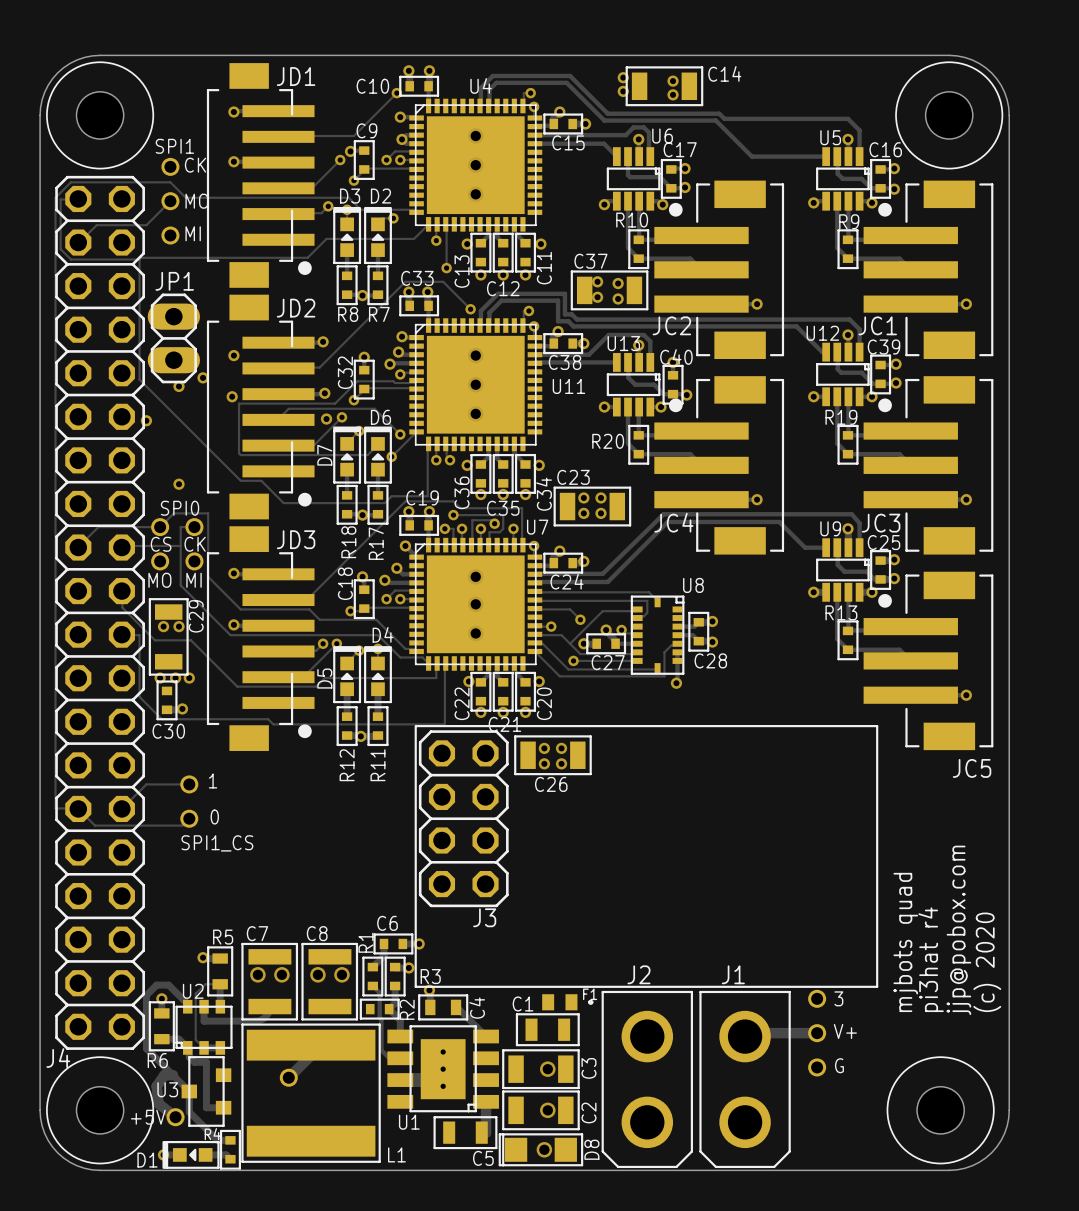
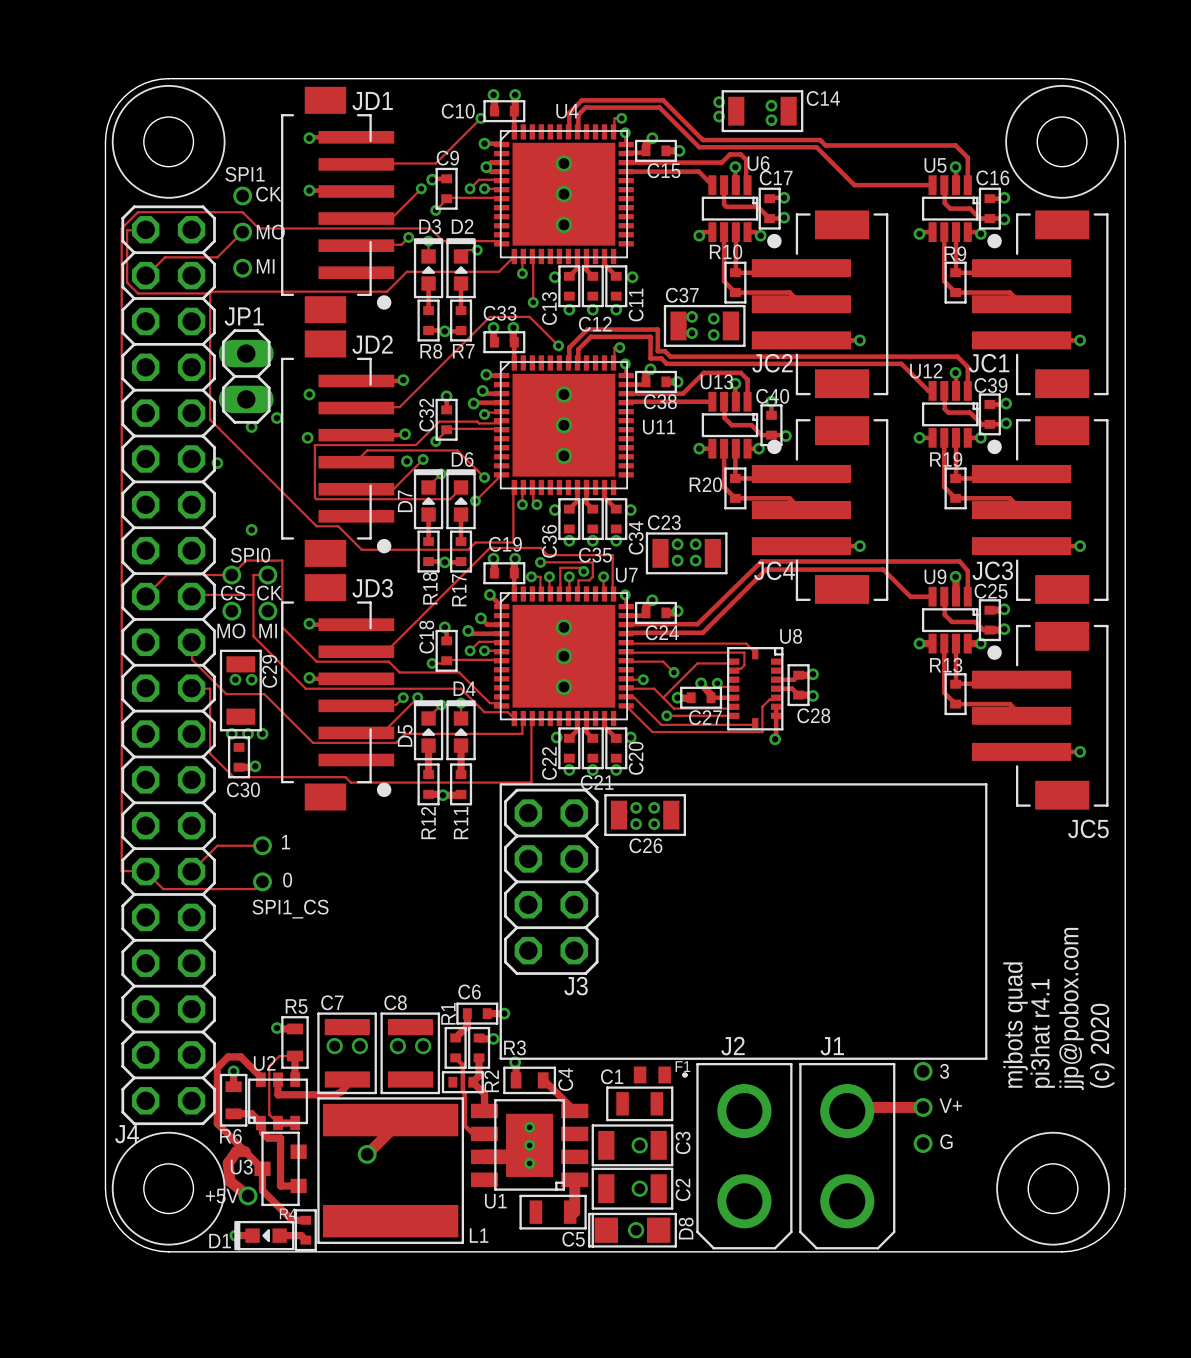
text: pi3hat r4 (931, 959) -> pi3hat r4.1 (1042, 1033)

